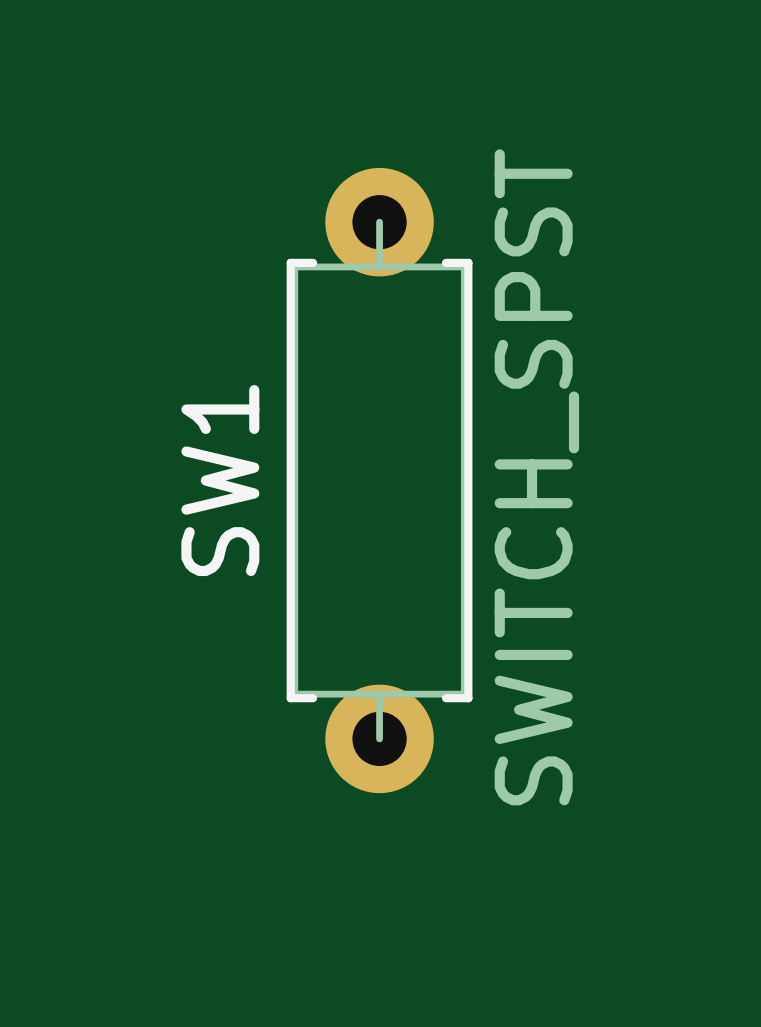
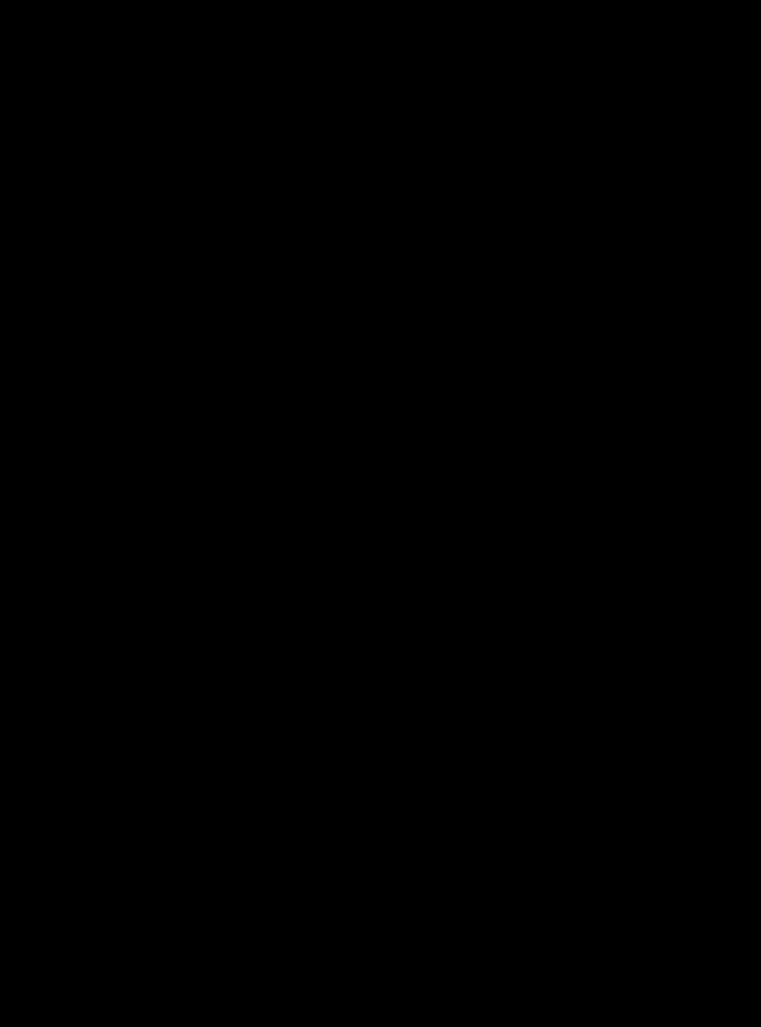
SW1: SWITCH_SPST (379, 480) -> none

